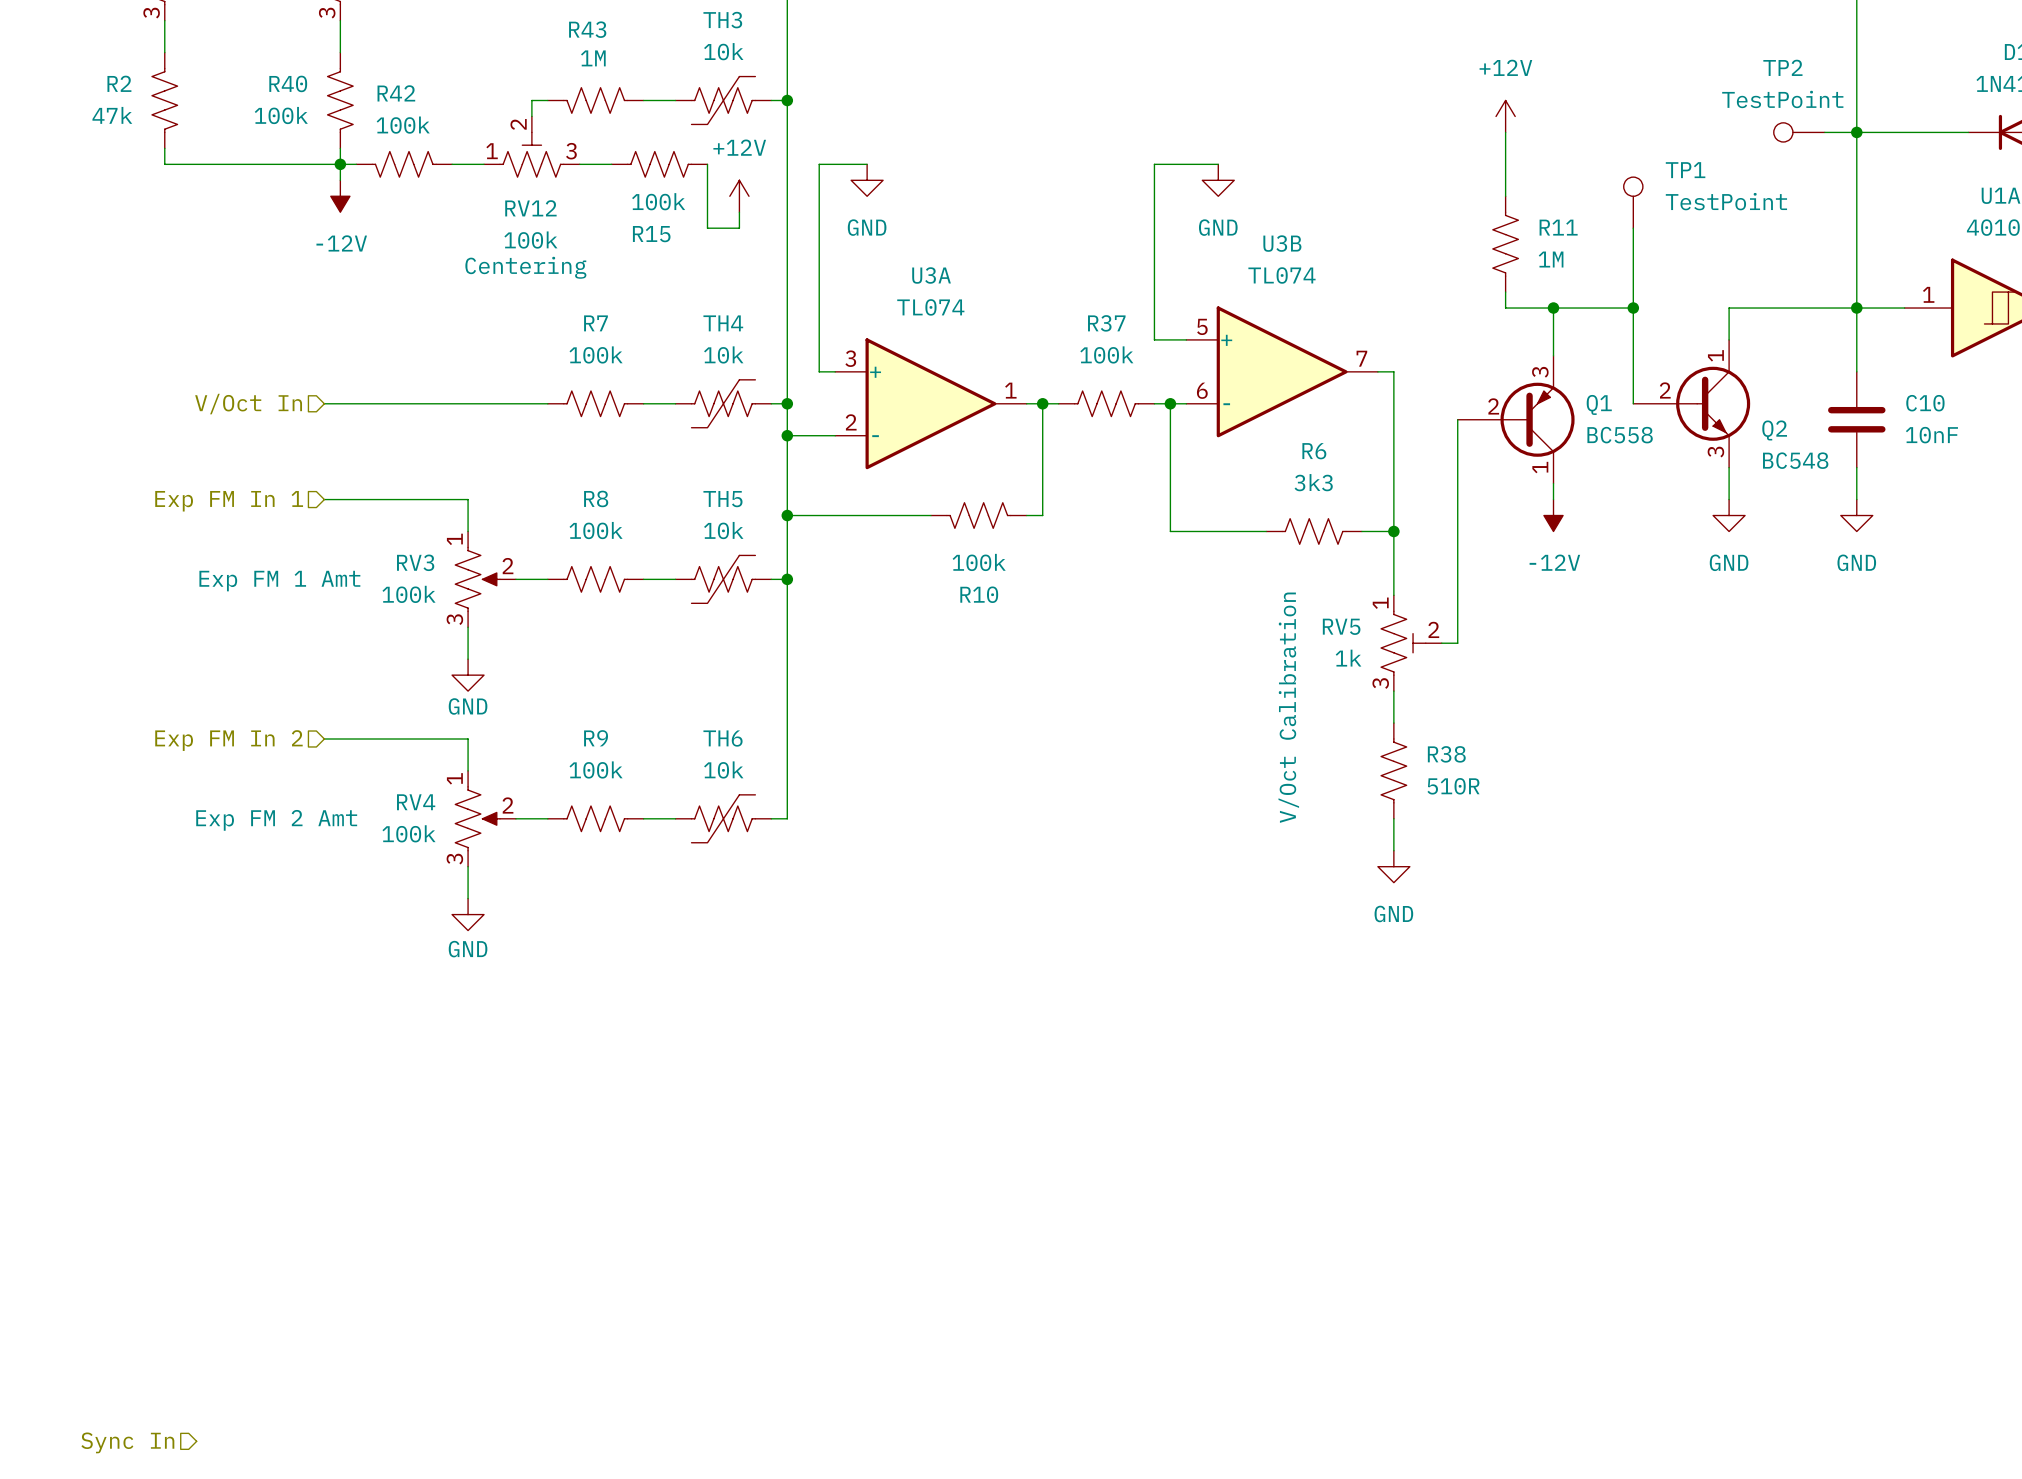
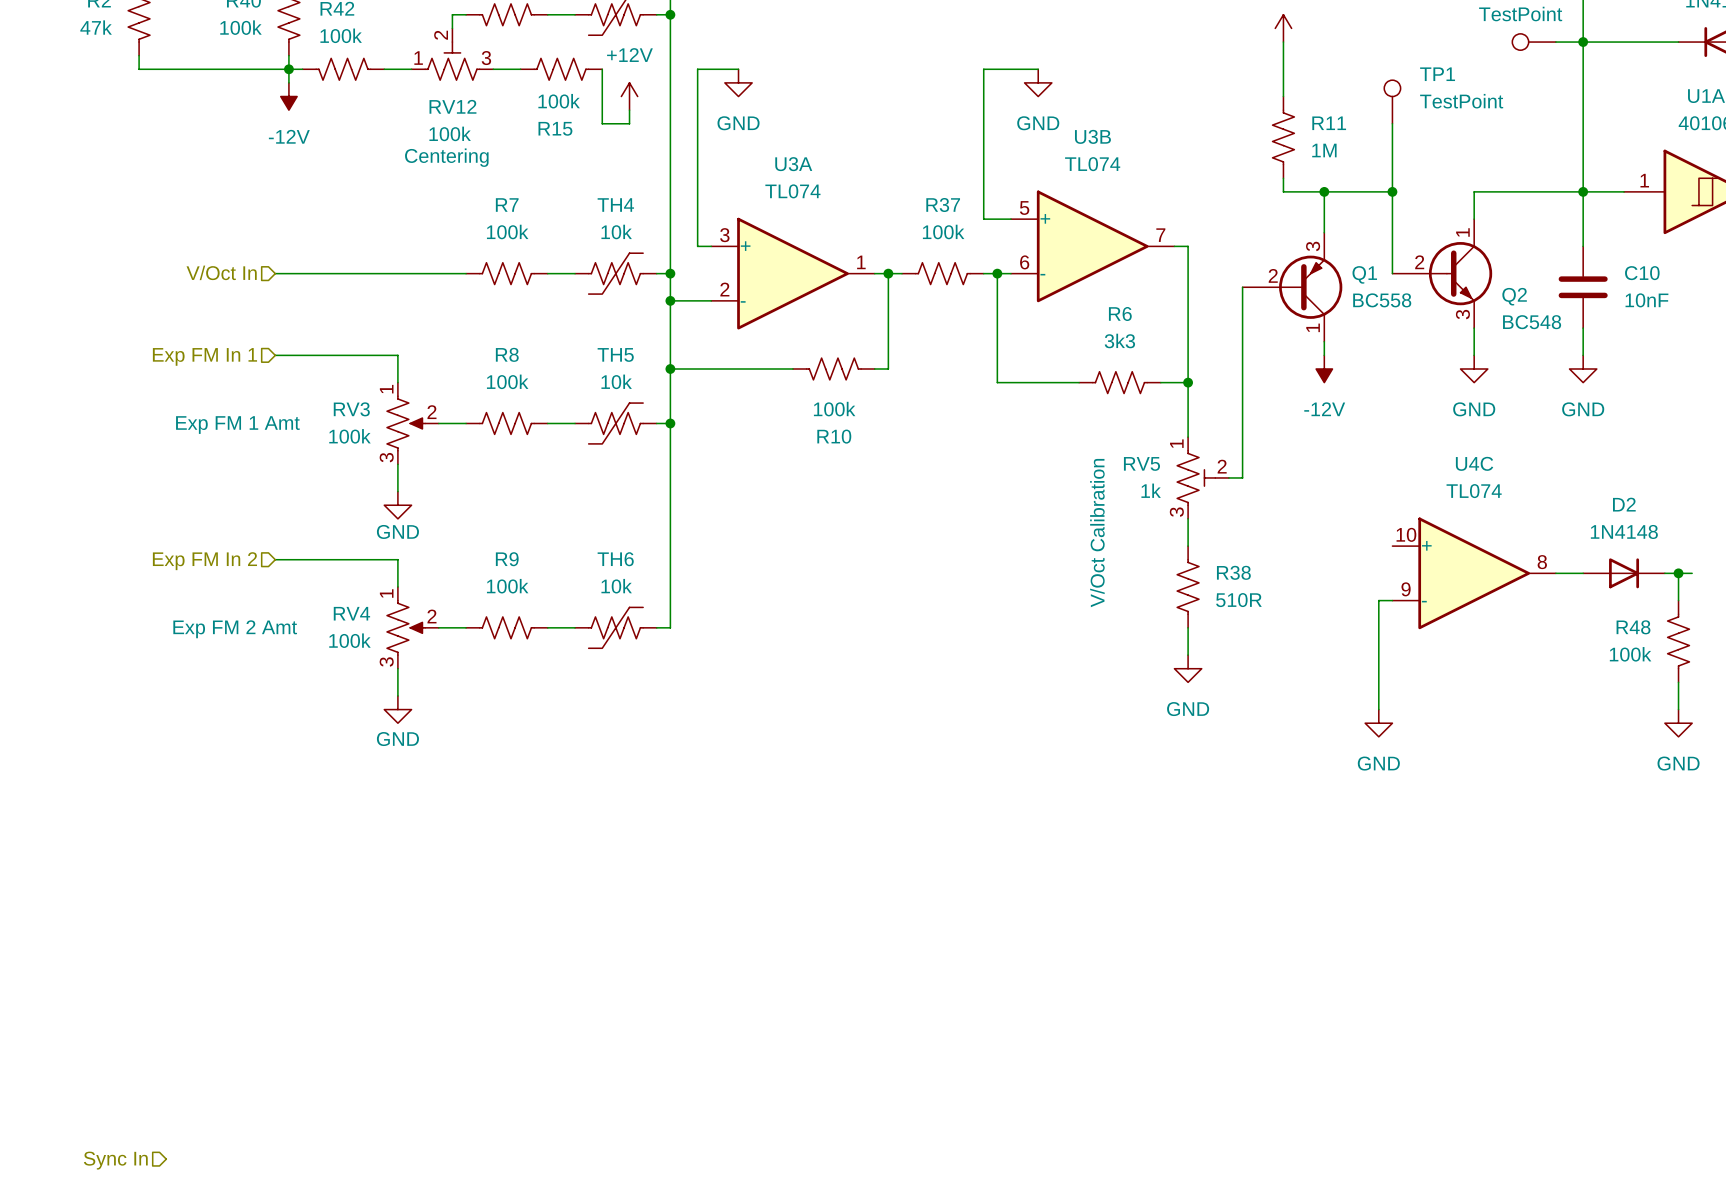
U4C: none -> TL074 (1474, 573)
wire: none -> (1555, 573) (1583, 573)
D2: none -> 1N4148 (1624, 573)
wire: none -> (1664, 573) (1692, 573)
wire: none -> (1678, 573) (1678, 600)
junction: none -> (1678, 573)
wire: none -> (1392, 600) (1378, 600) (1378, 709)
R48: none -> 100k (1678, 641)
wire: none -> (1678, 682) (1678, 709)
power symbol: none -> GND (1378, 723)
power symbol: none -> GND (1678, 723)

